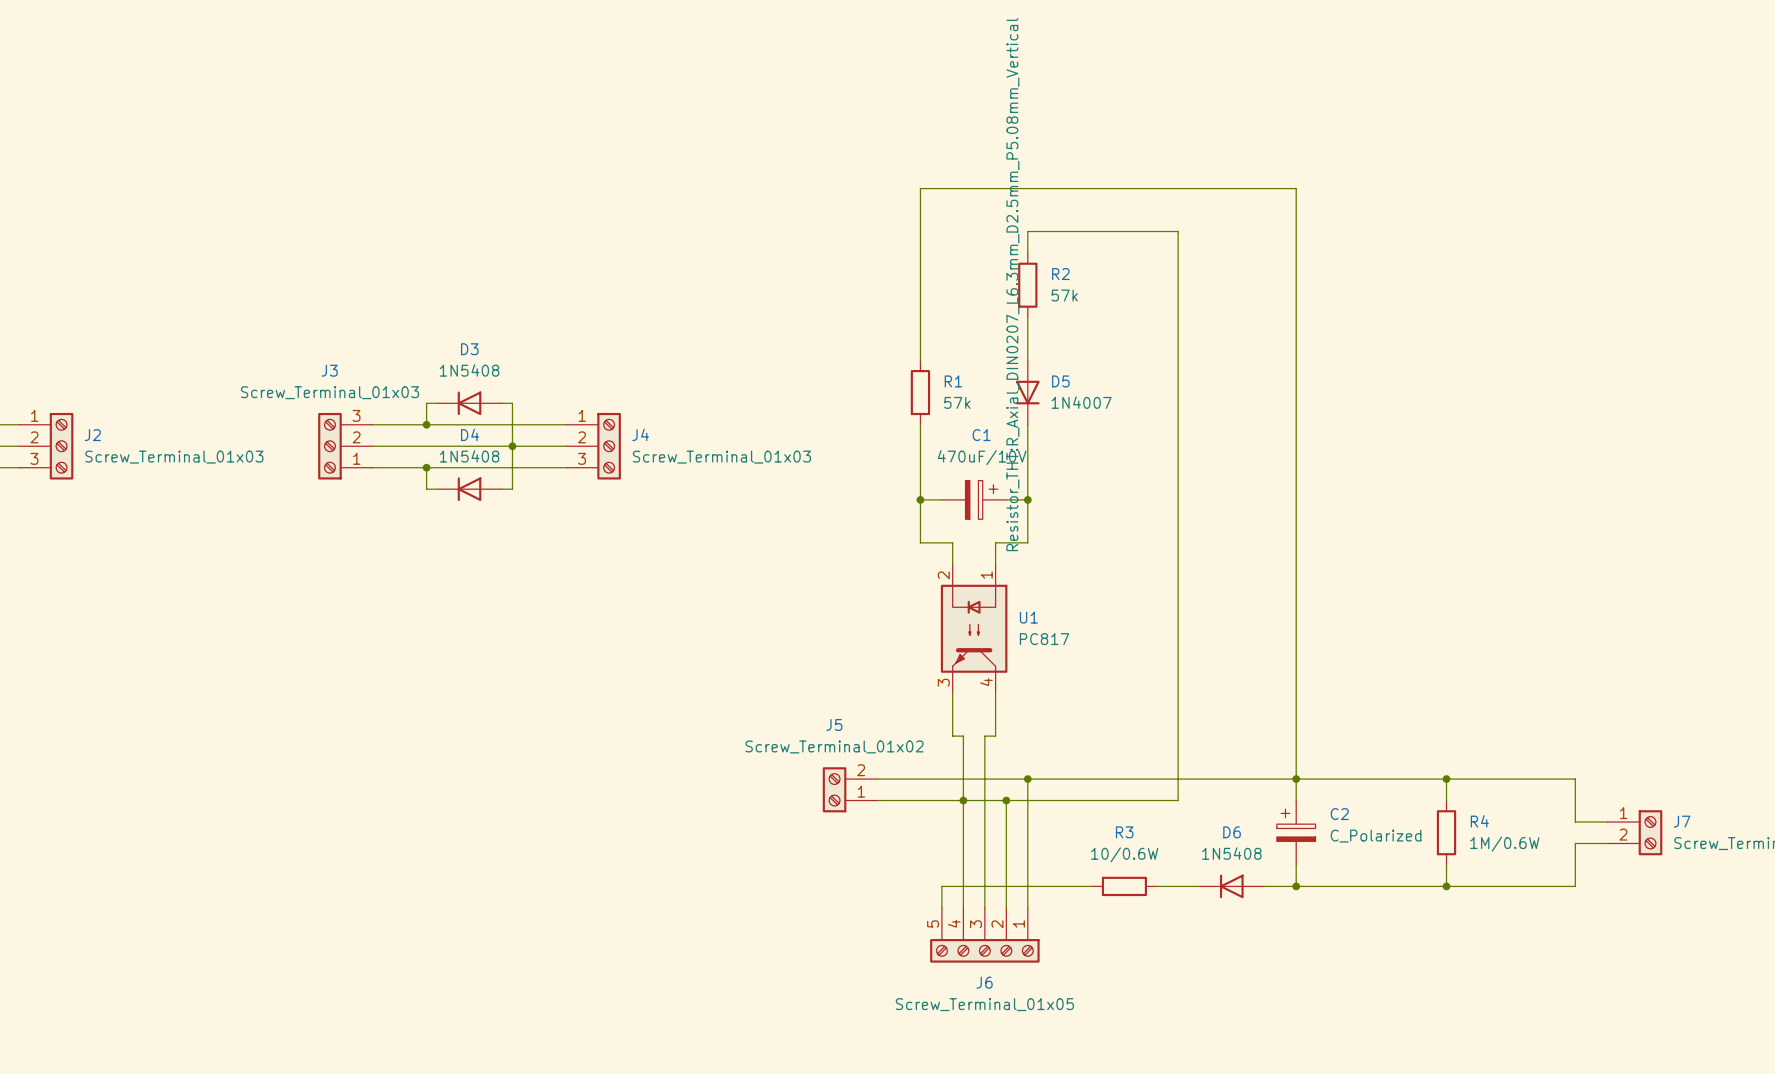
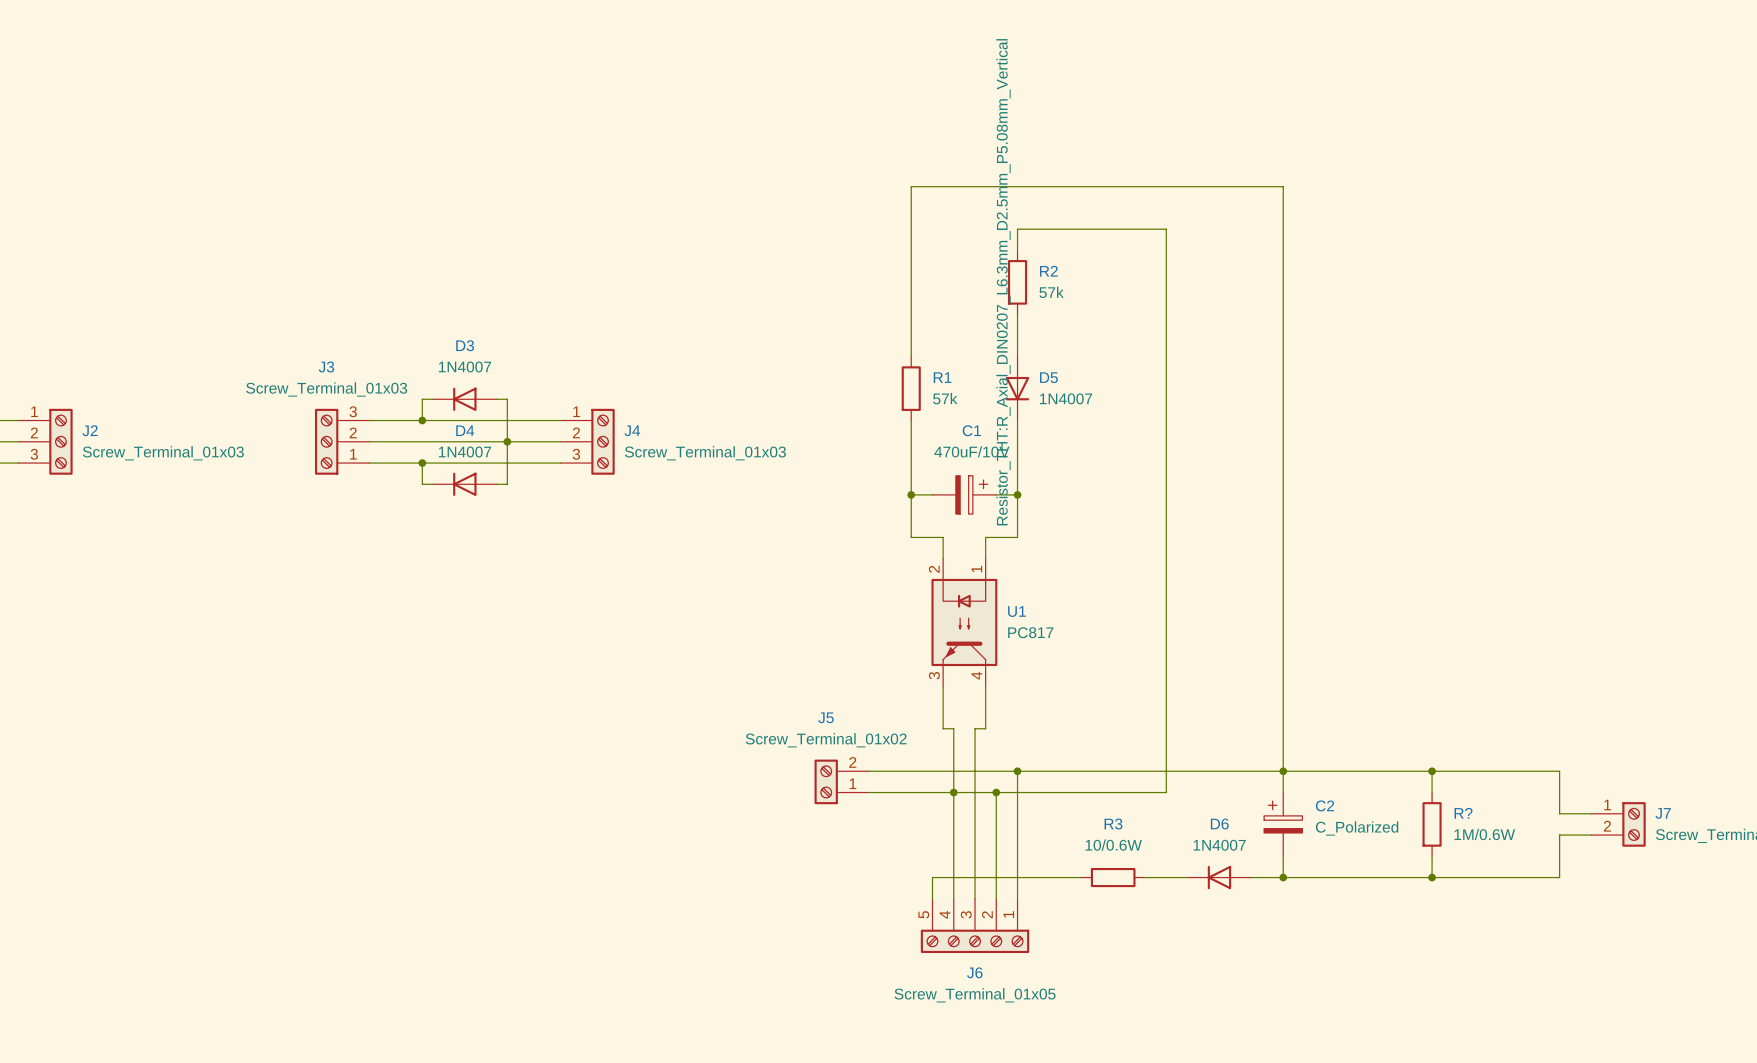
D3 value: 1N5408 (469, 370) -> 1N4007 (465, 366)
D4 value: 1N5408 (469, 456) -> 1N4007 (465, 452)
R4 name: R4 (1479, 821) -> R? (1463, 813)
D6 value: 1N5408 (1231, 853) -> 1N4007 (1219, 845)

